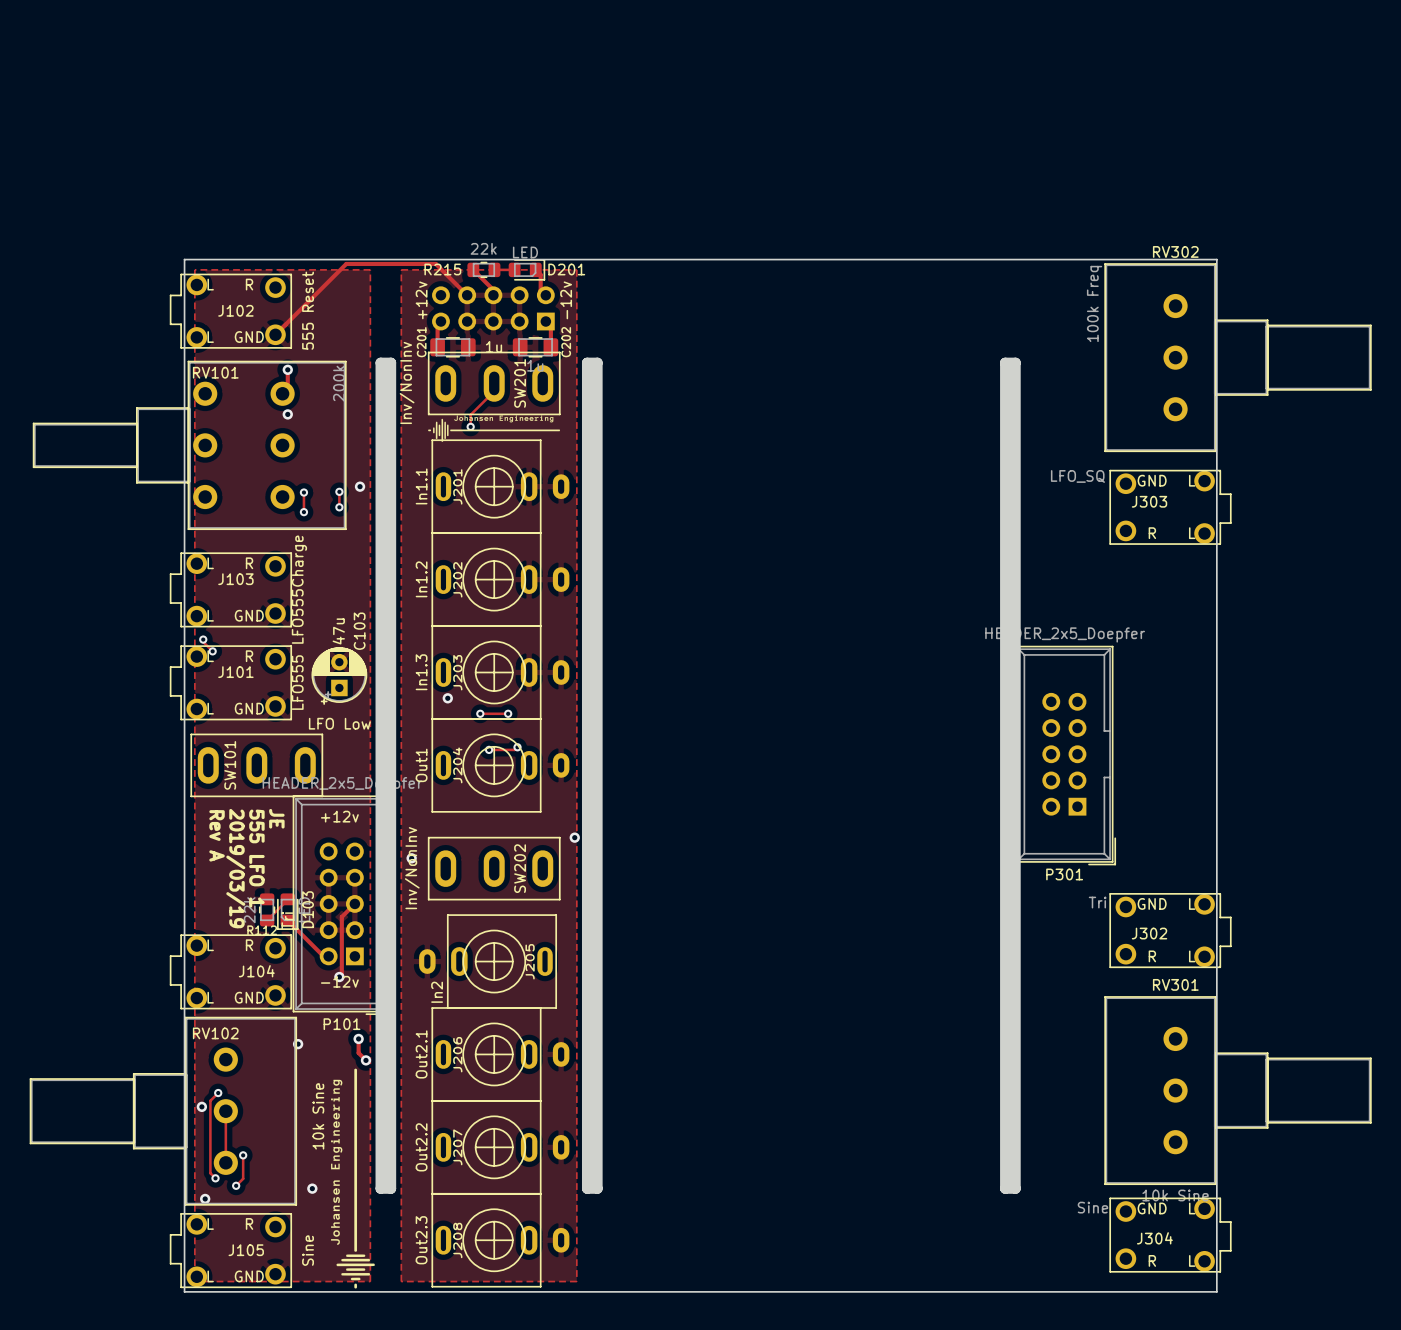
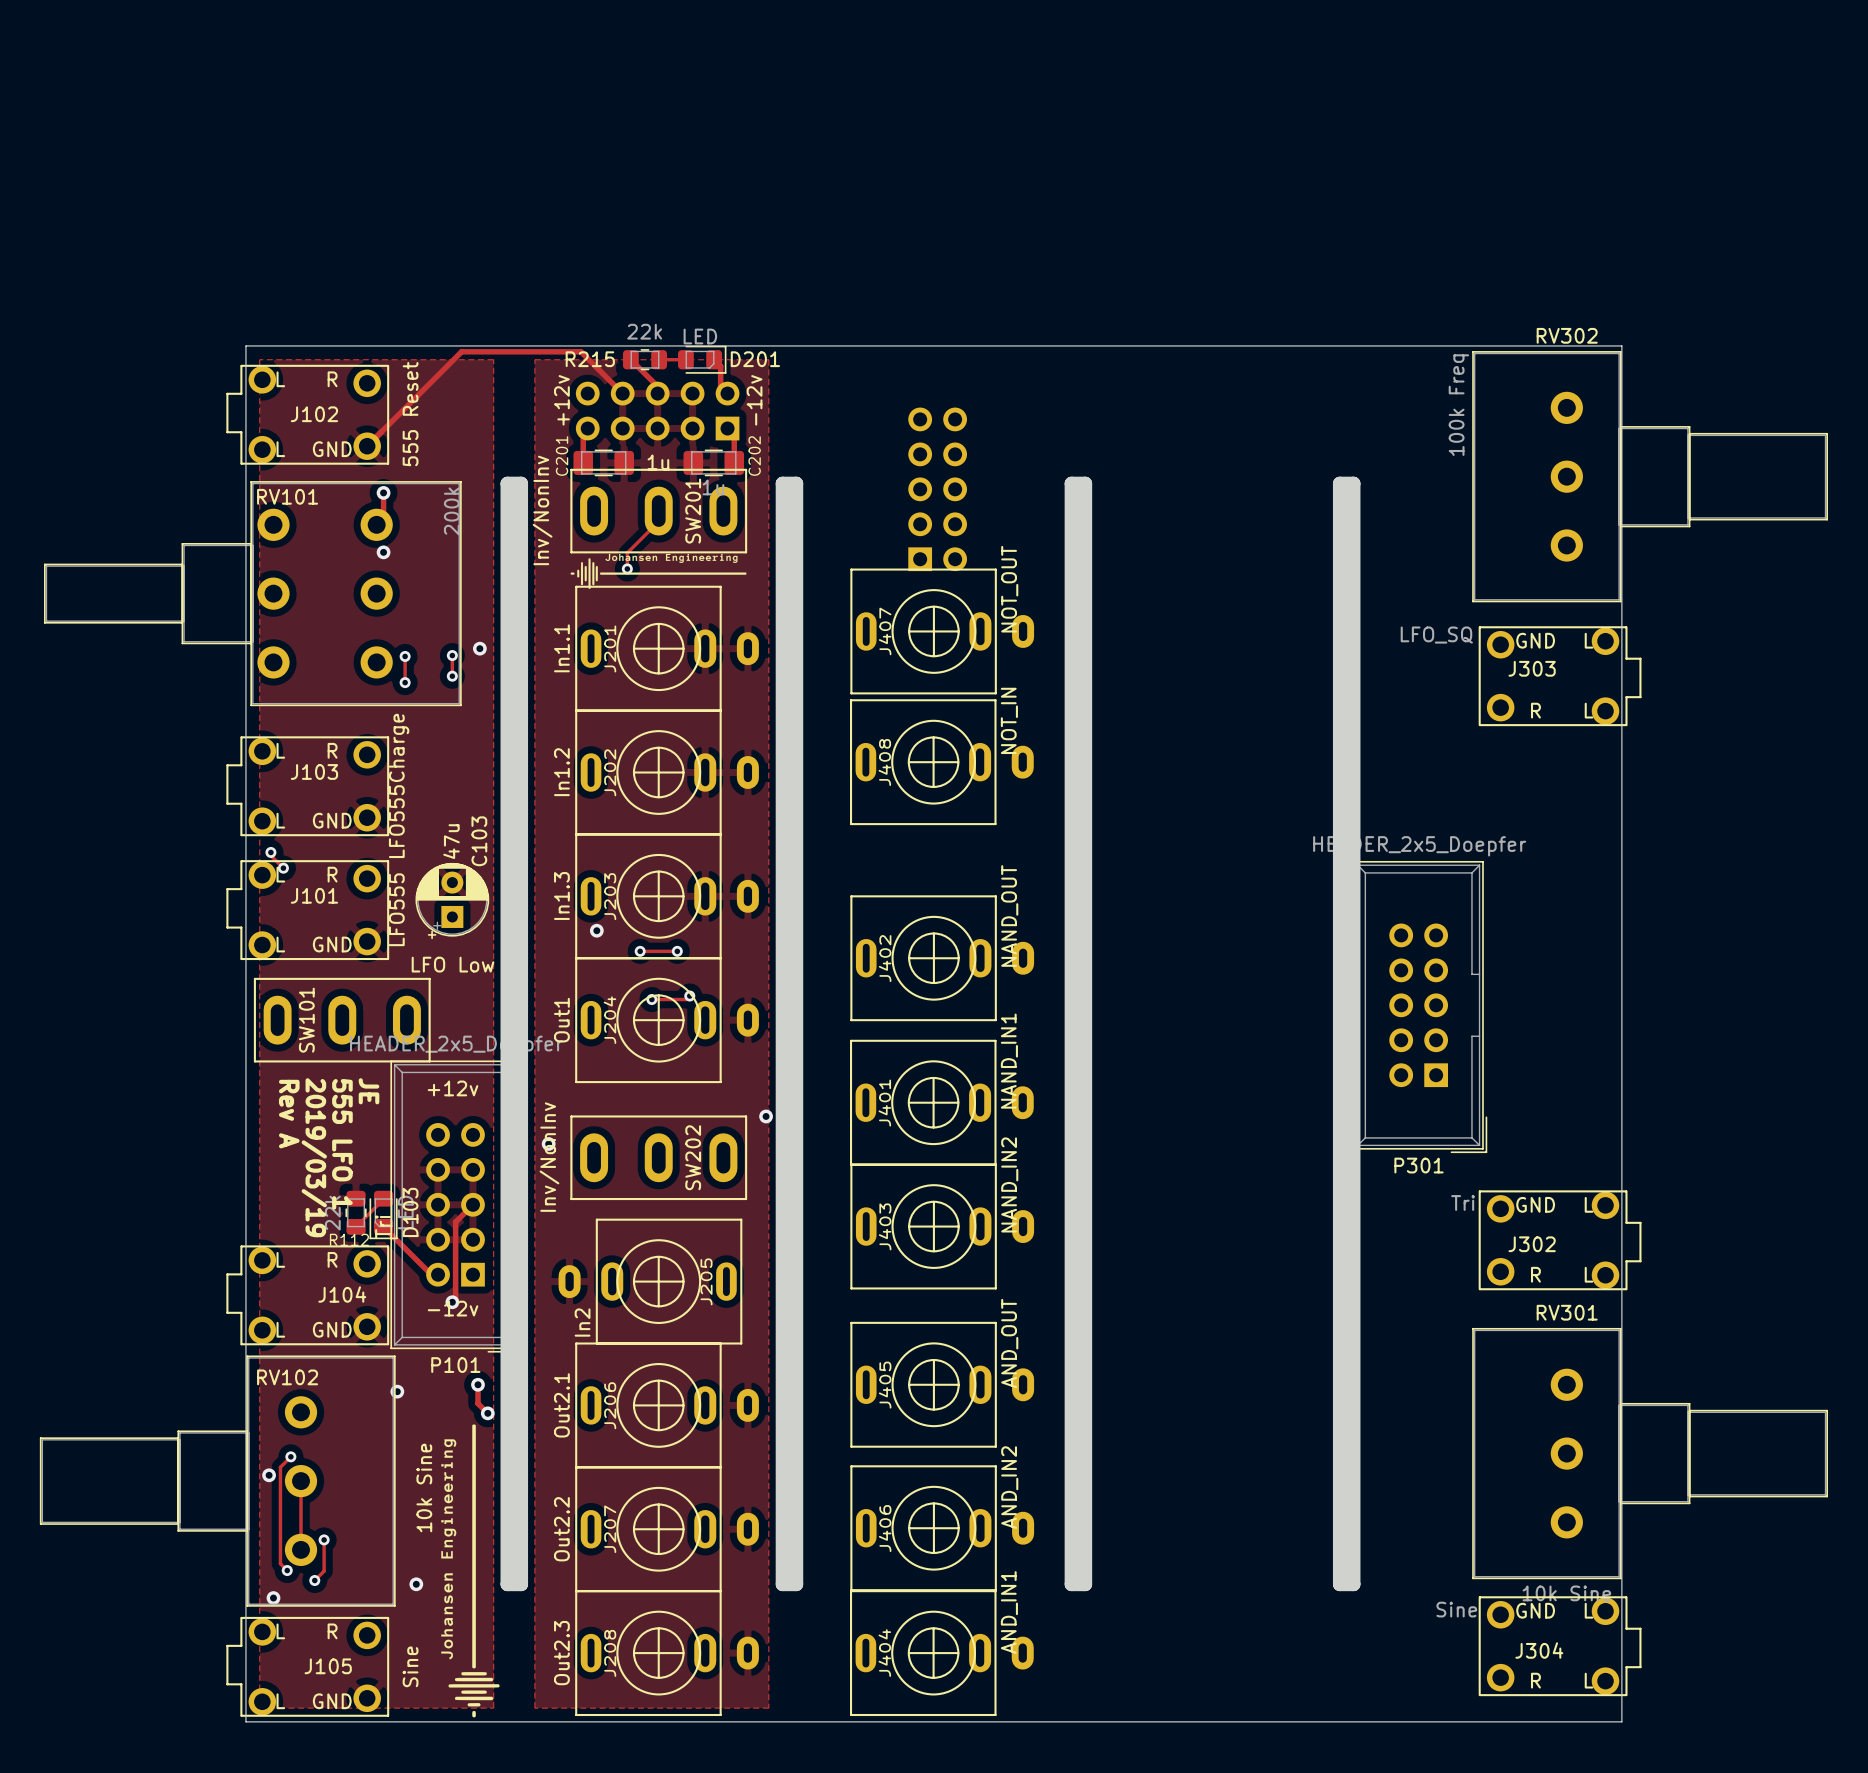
board edge: none -> (1071, 483) (1085, 483) (1085, 1584) (1071, 1584) (1071, 483)
part: none -> (937, 489)
J407: none -> NOT_OUT (942, 631)
J408: none -> NOT_IN (941, 762)
J402: none -> NAND_OUT (942, 958)
J401: none -> NAND_IN1 (941, 1102)
J403: none -> NAND_IN2 (942, 1226)
J405: none -> AND_OUT (942, 1384)
J406: none -> AND_IN2 (942, 1528)
J404: none -> AND_IN1 (941, 1653)

